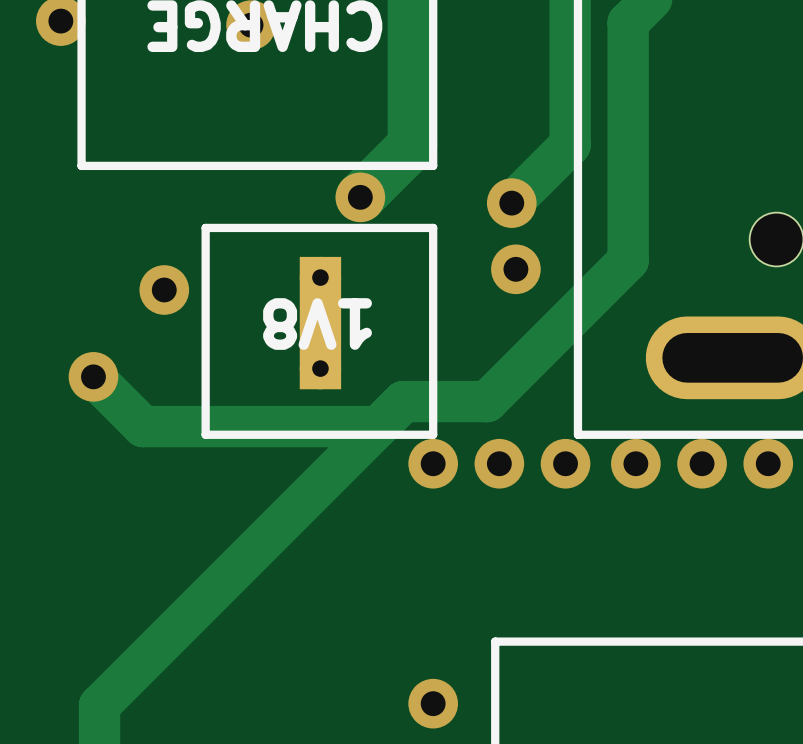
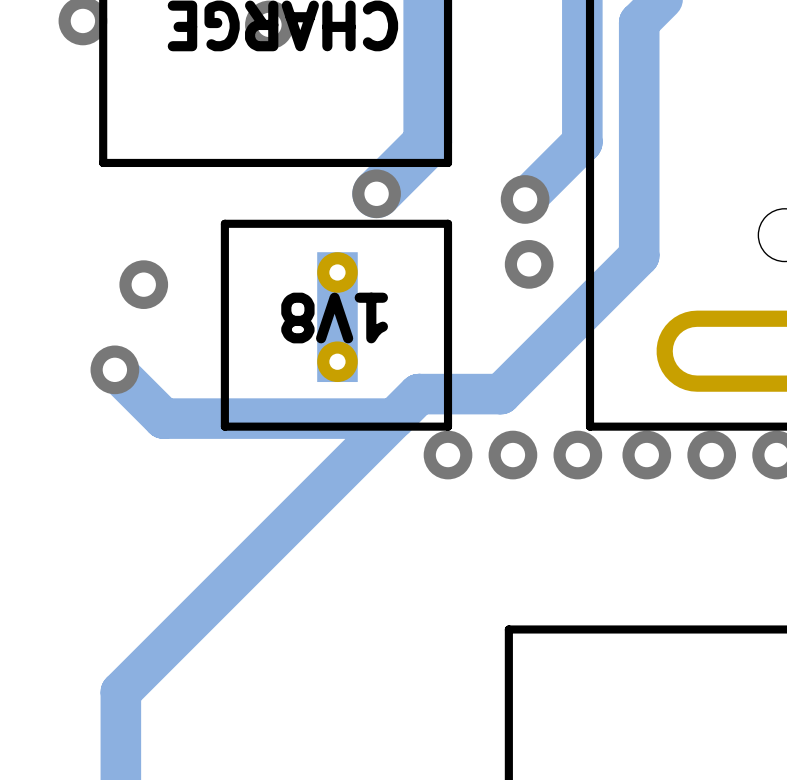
via position: (164, 289) -> (143, 284)
via: (433, 703) -> none

